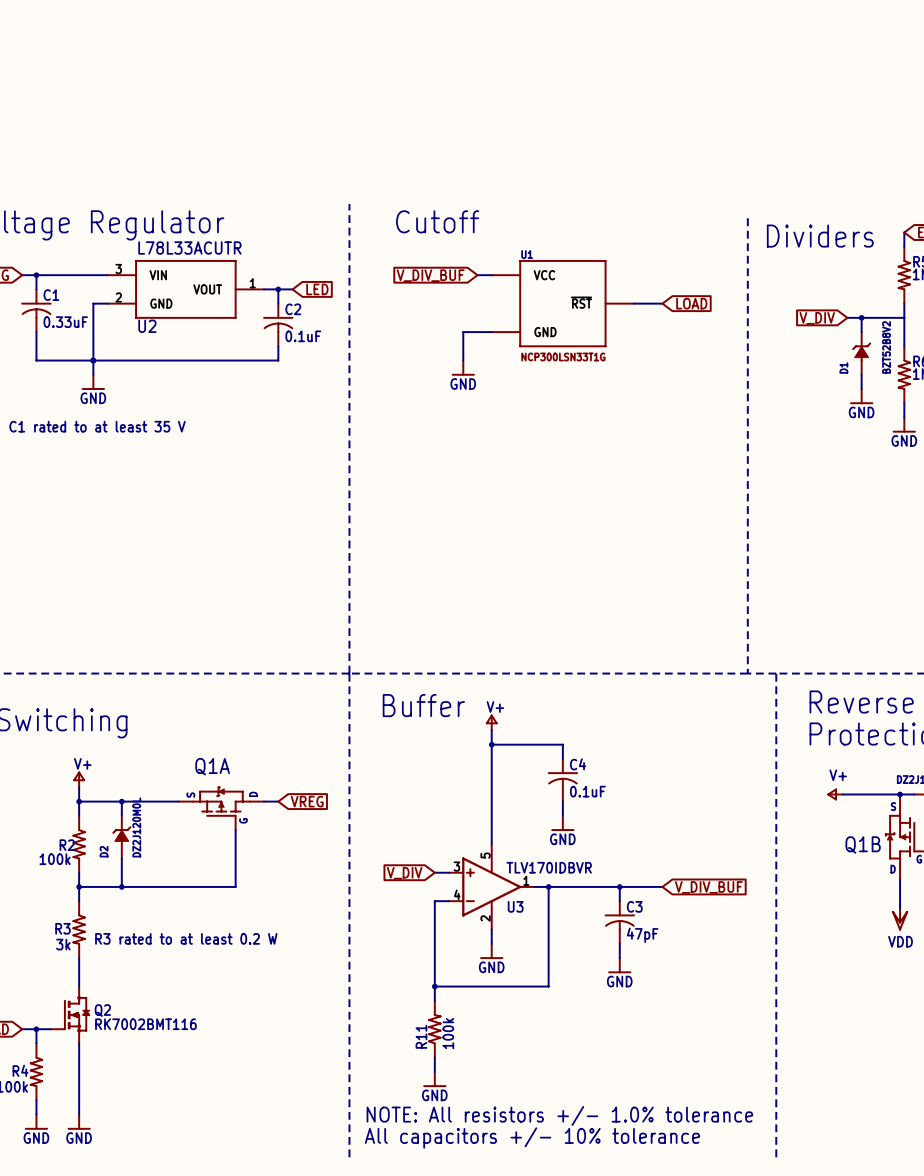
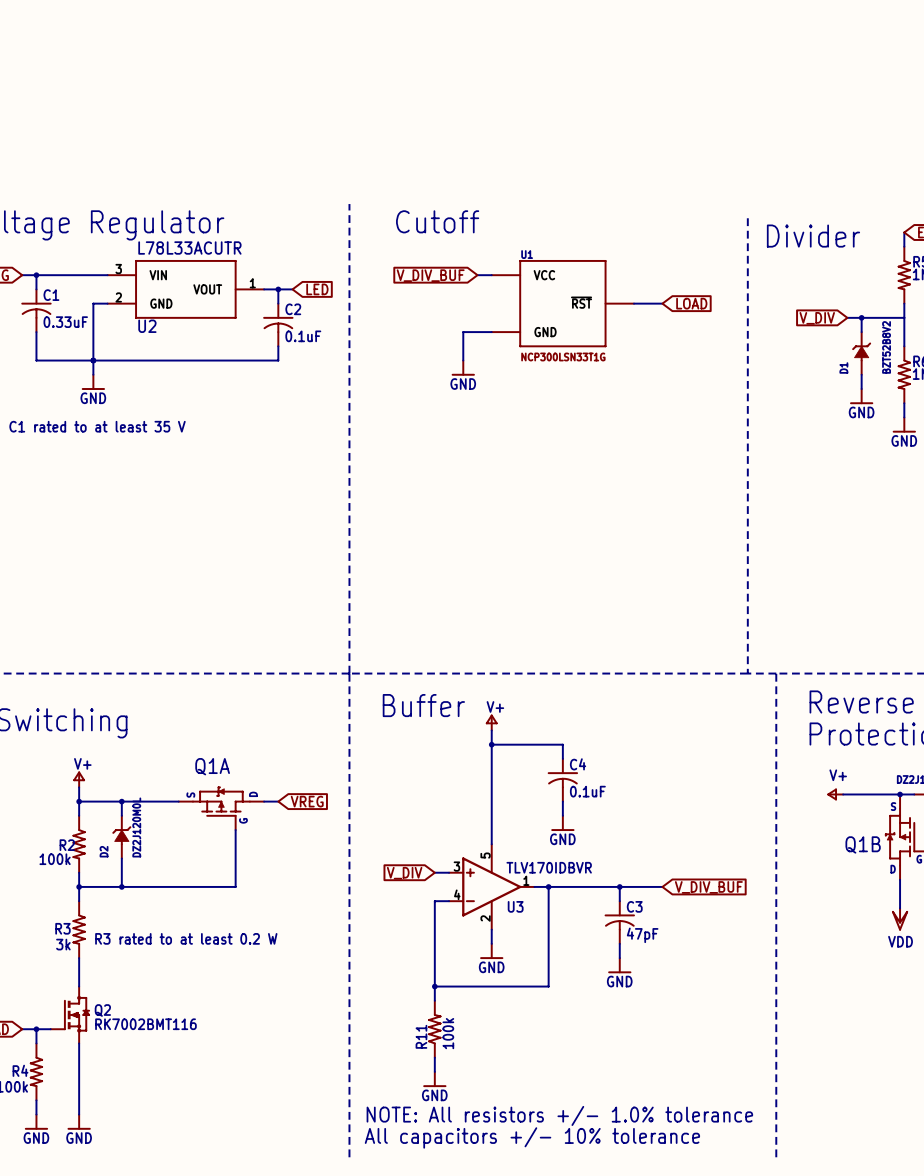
text: Dividers (820, 236) -> Divider (813, 236)

